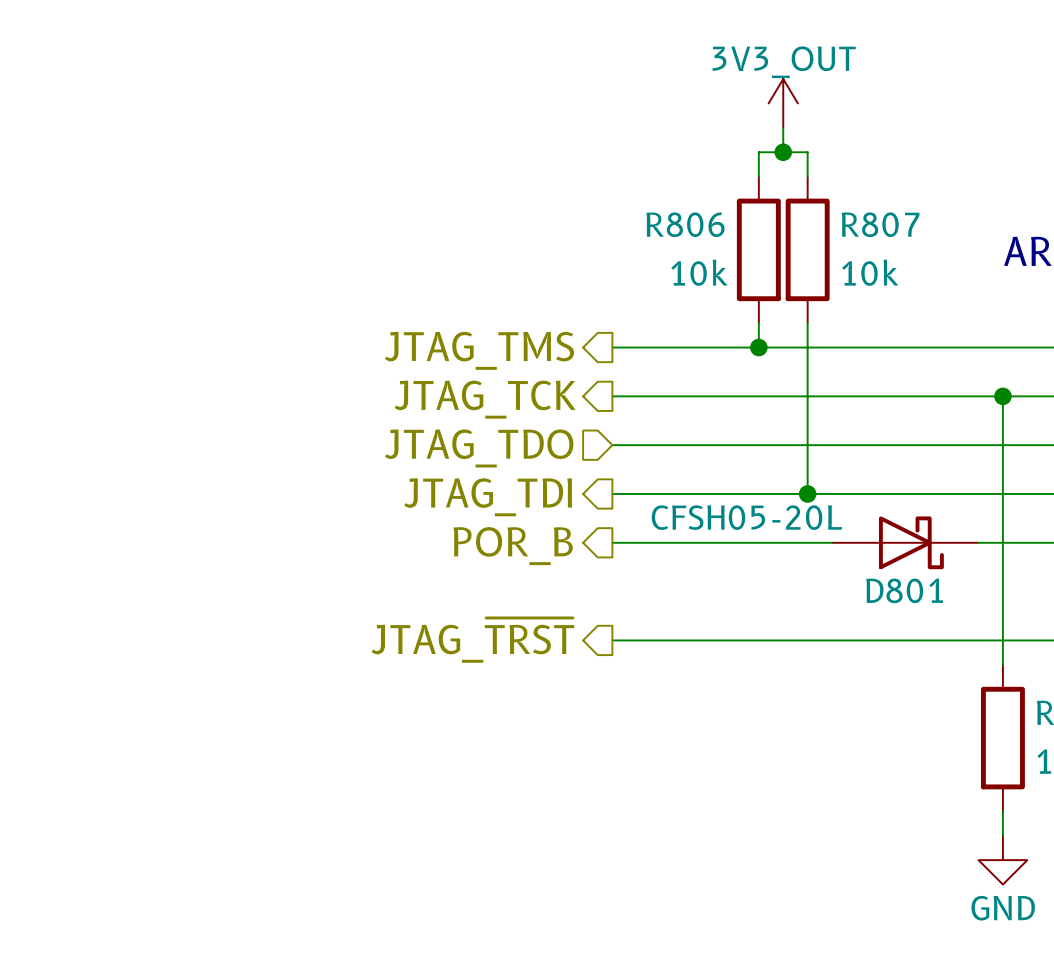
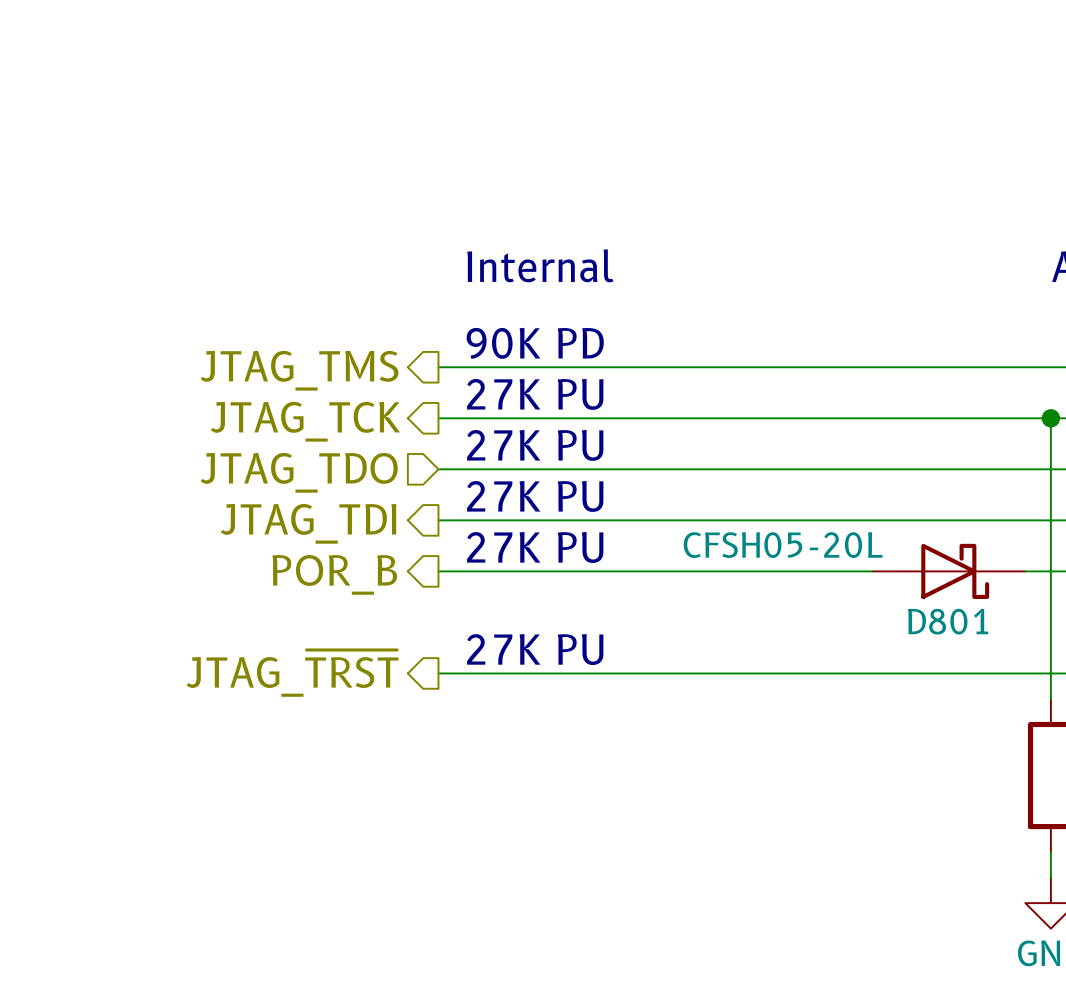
power symbol: 3V3_OUT (783, 103) -> none
wire: (783, 127) (783, 152) -> none
junction: (783, 152) -> none
wire: (758, 176) (758, 152) (807, 152) (807, 176) -> none
R806: 10k (758, 249) -> none
R807: 10k (807, 249) -> none
text: none -> Internal (540, 265)
wire: (758, 323) (758, 347) -> none
wire: (807, 323) (807, 493) -> none
text: none -> 90K PD (535, 343)
wire: none -> (438, 367) (642, 367)
junction: (758, 347) -> none
hierarchical label position: JTAG_TMS (479, 350) -> JTAG_TMS (299, 370)
text: none -> 27K PU (535, 394)
wire: none -> (438, 418) (642, 418)
hierarchical label position: JTAG_TCK (485, 399) -> JTAG_TCK (305, 421)
text: none -> 27K PU (535, 445)
wire: none -> (438, 469) (642, 469)
hierarchical label position: JTAG_TDO (479, 448) -> JTAG_TDO (299, 472)
text: none -> 27K PU (535, 496)
wire: none -> (438, 520) (642, 520)
junction: (807, 493) -> none
hierarchical label position: JTAG_TDI (488, 497) -> JTAG_TDI (308, 523)
text: none -> 27K PU (535, 547)
wire: none -> (438, 571) (642, 571)
hierarchical label position: POR_B (513, 546) -> POR_B (334, 574)
text: none -> 27K PU (535, 649)
wire: none -> (438, 673) (642, 673)
hierarchical label position: JTAG_~{TRST} (472, 640) -> JTAG_~{TRST} (292, 673)

